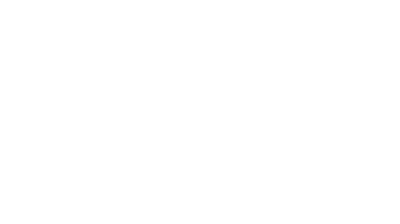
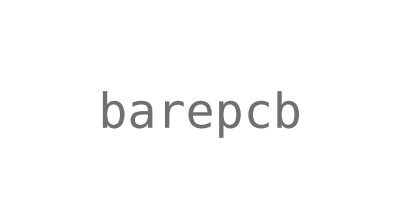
drawing: none -> [102, 91, 300, 138]

